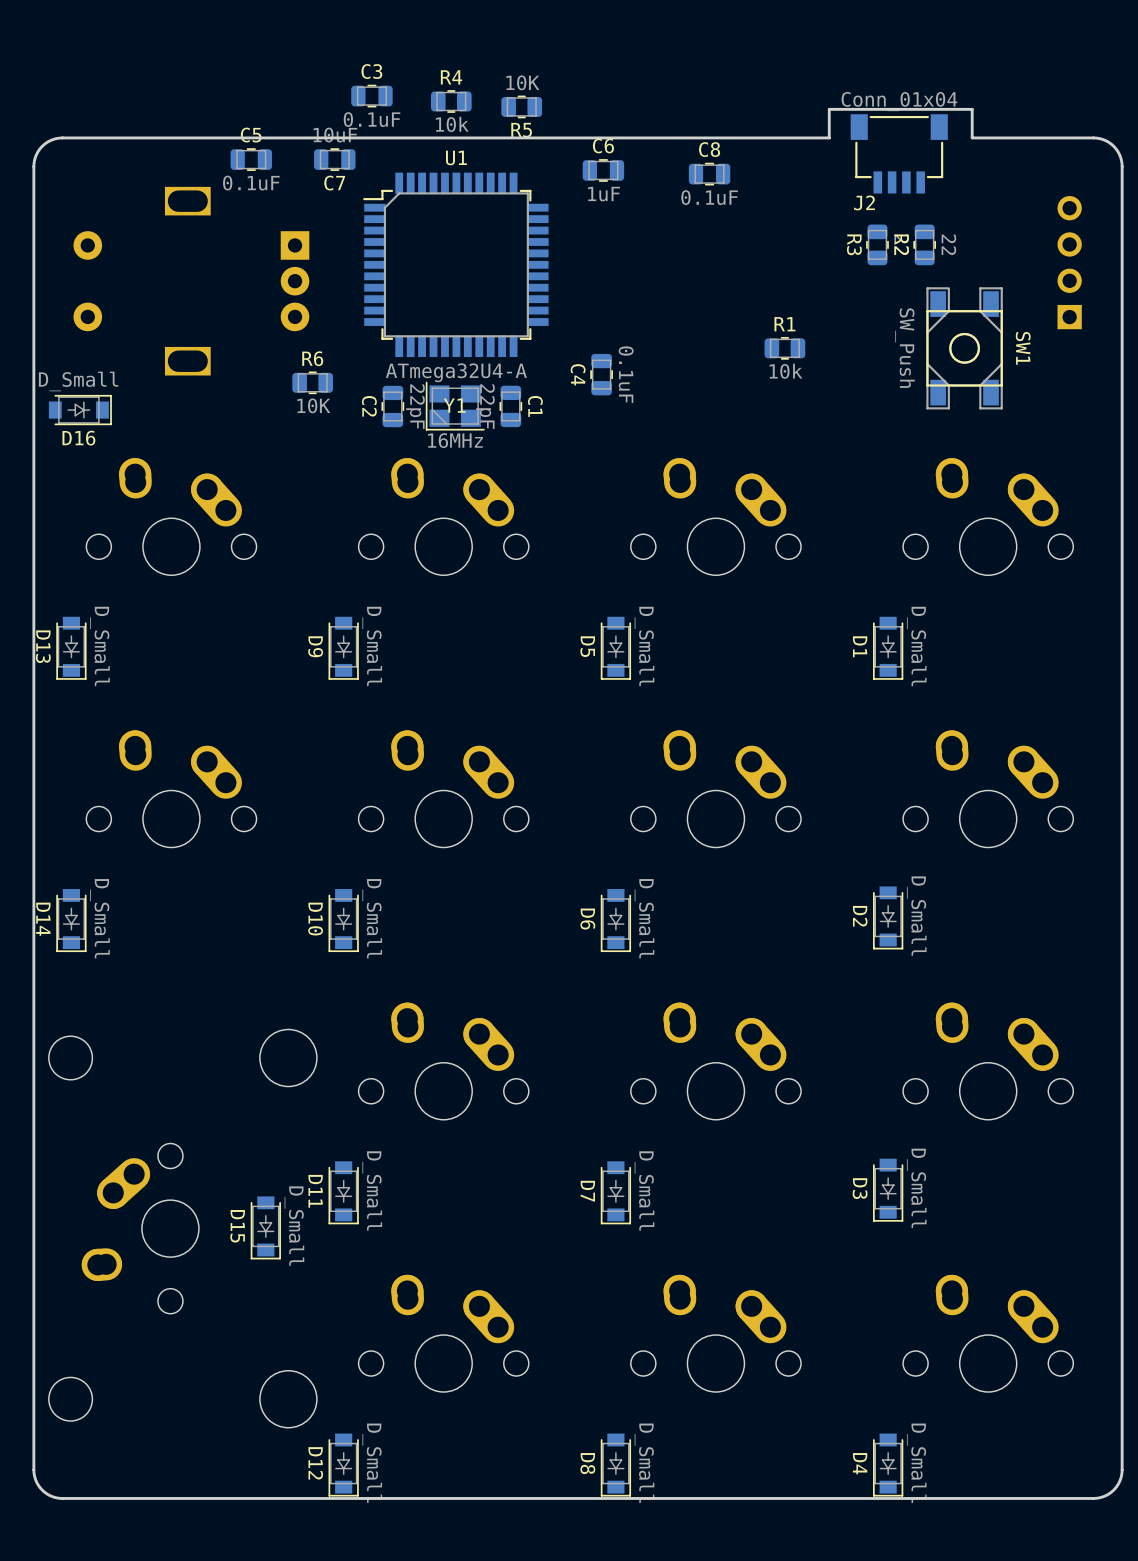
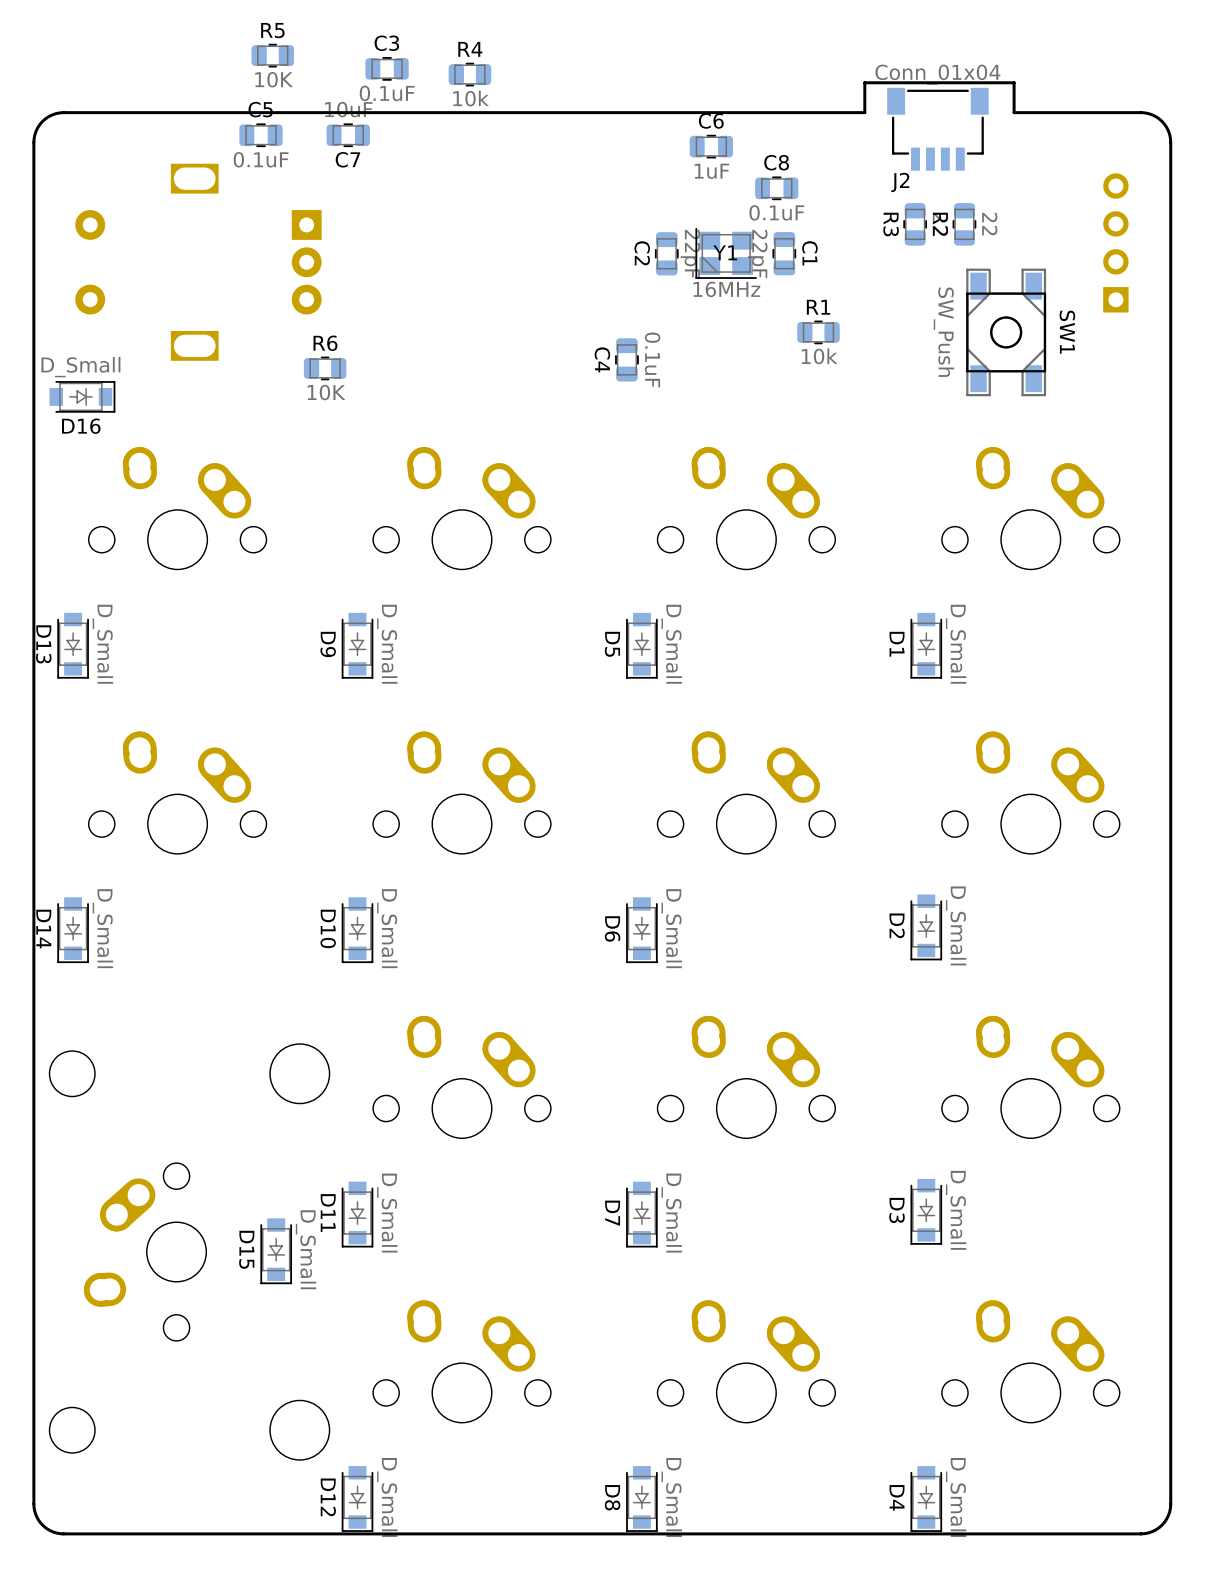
R5 value position: 10K (522, 82) -> 10K (274, 79)
R5 position: (521, 106) -> (272, 55)
R5 name position: R5 (521, 130) -> R5 (272, 30)
C6 position: (603, 170) -> (711, 146)
C8 position: (709, 174) -> (776, 188)
U1: ATmega32U4-A (455, 264) -> none
C2 position: (392, 406) -> (666, 253)
Y1 position: (455, 406) -> (726, 253)
C1 position: (510, 406) -> (784, 253)

